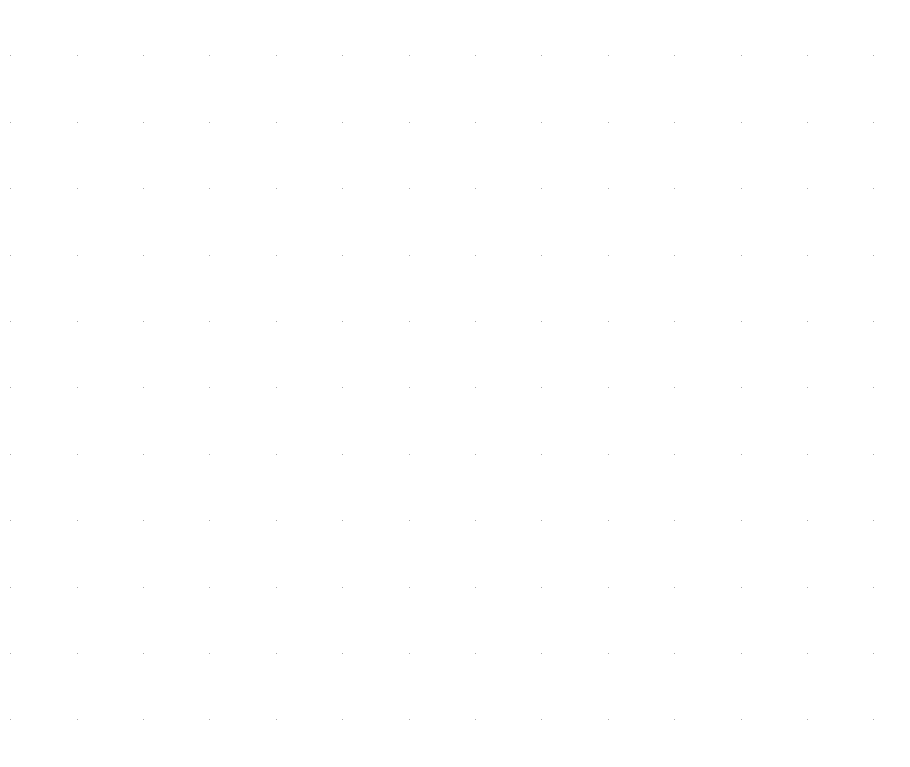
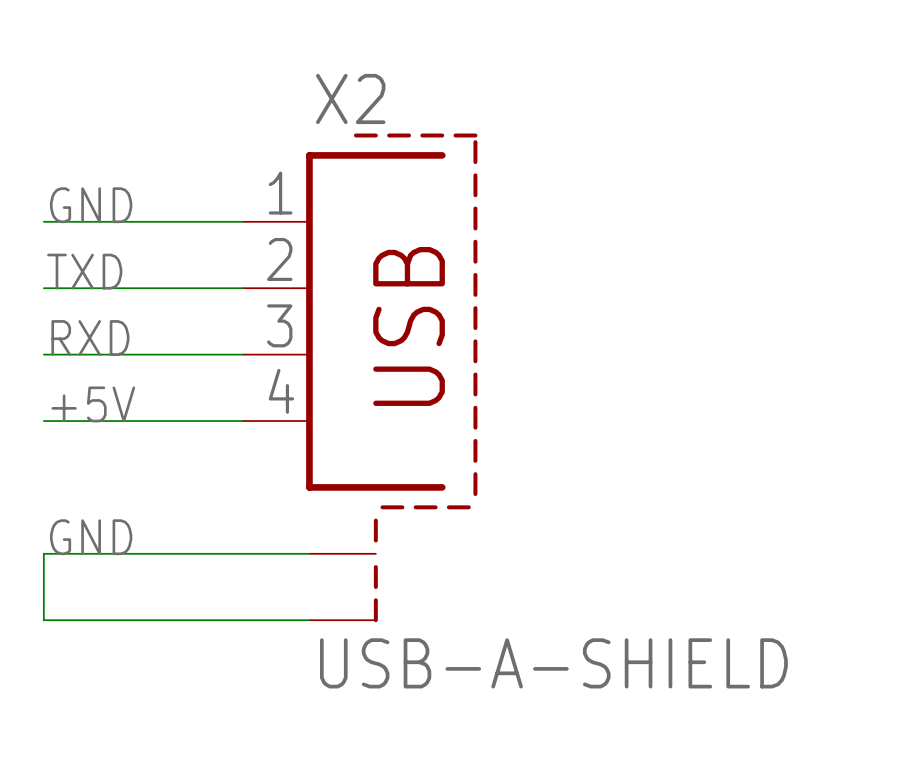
label: none -> GND (91, 205)
wire: none -> (43, 221) (243, 221)
label: none -> TXD (84, 271)
wire: none -> (43, 288) (243, 288)
label: none -> RXD (90, 338)
wire: none -> (43, 354) (243, 354)
X2: none -> USB-A-SHIELD (360, 377)
label: none -> +5V (93, 404)
wire: none -> (43, 421) (243, 421)
label: none -> GND (91, 537)
wire: none -> (309, 553) (43, 553) (43, 620) (309, 620)

